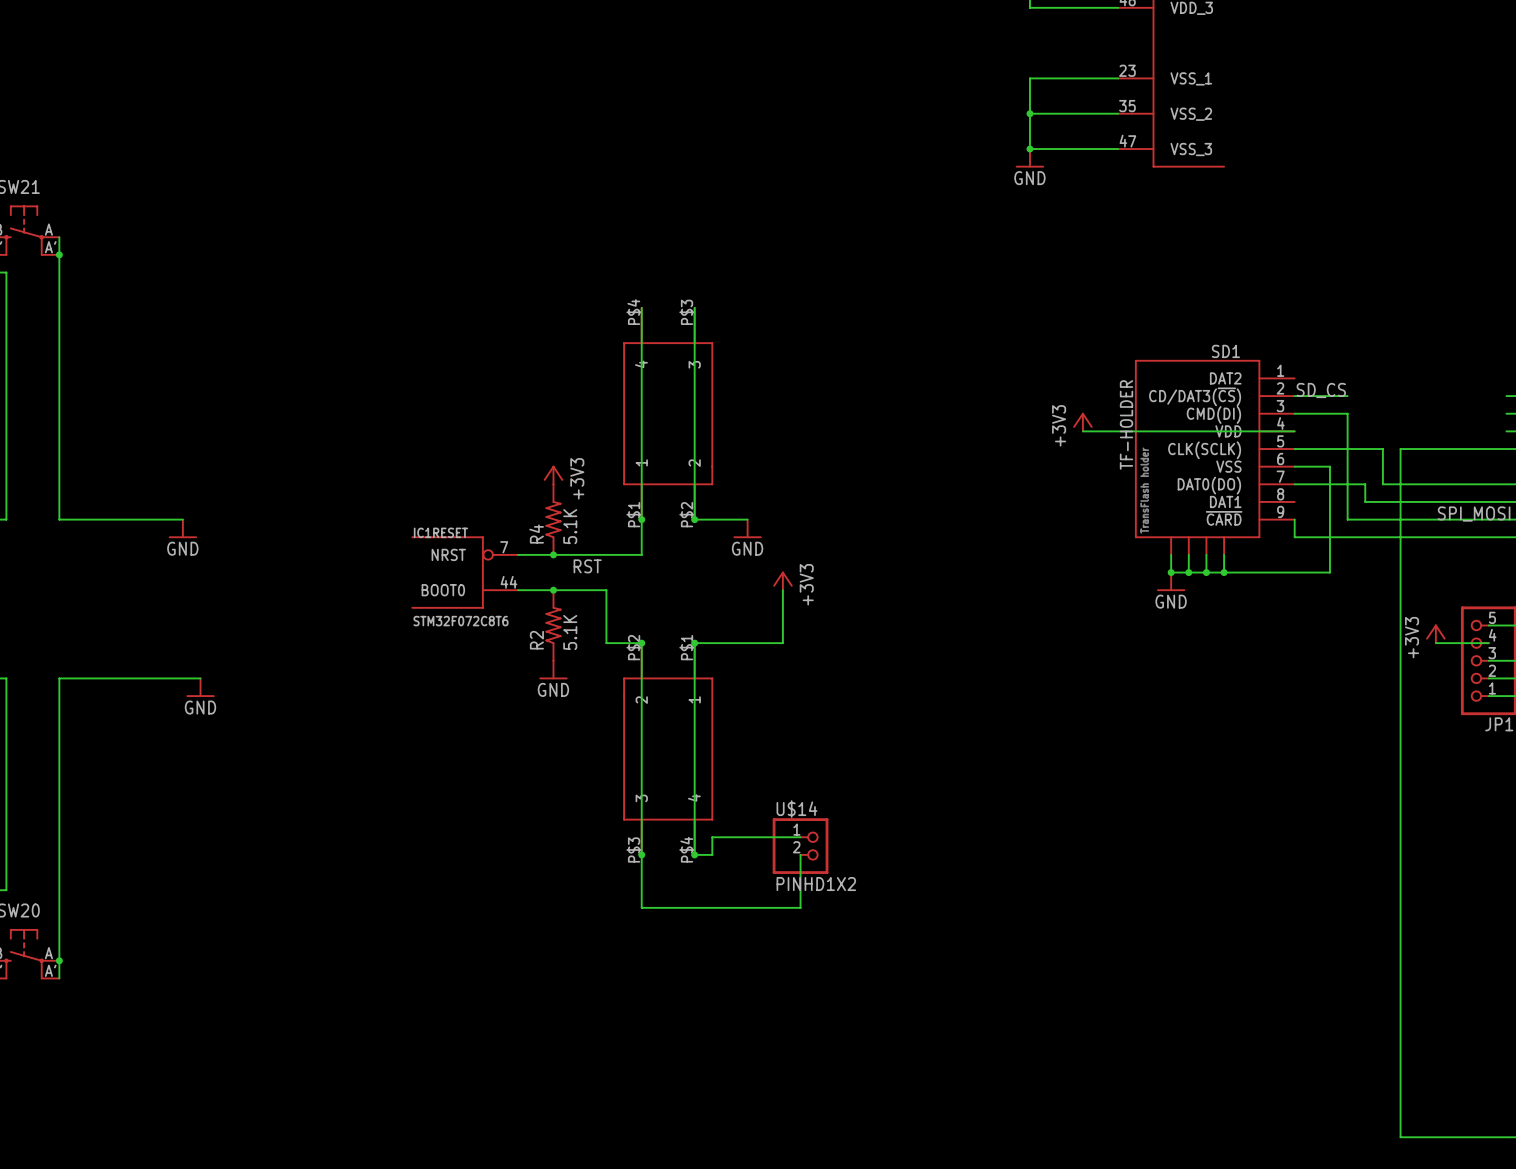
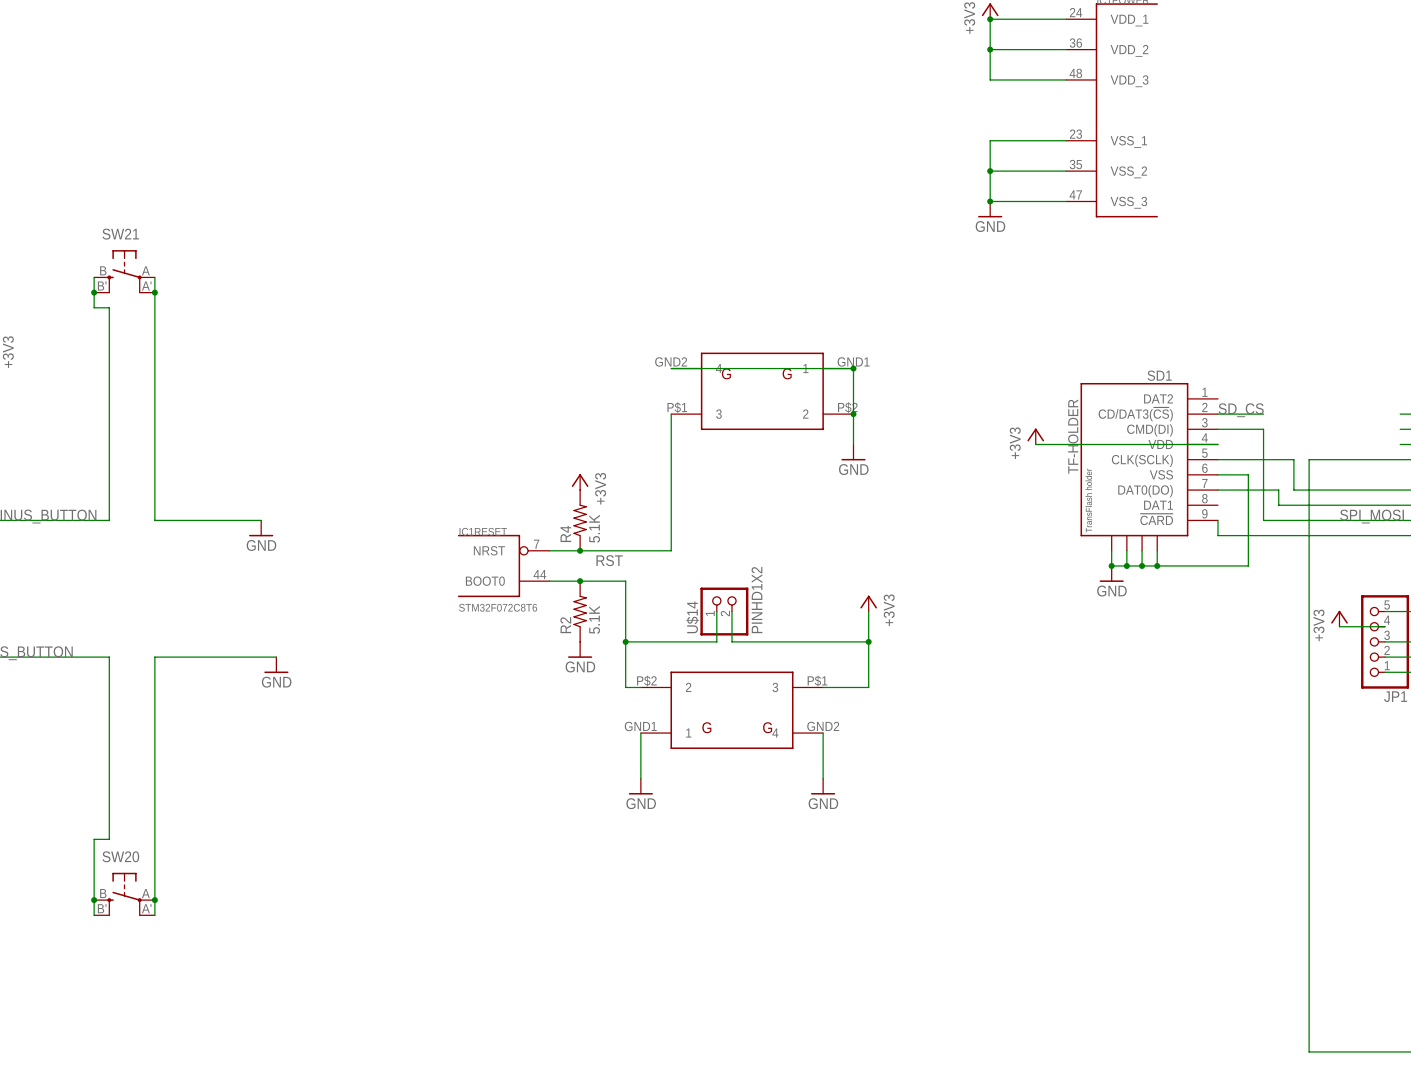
wire: (641, 307) (641, 554) -> (671, 414) (671, 550) (656, 550)
wire: (694, 307) (694, 519) (747, 519) -> none
wire: none -> (671, 368) (853, 368) (853, 444)
junction: none -> (853, 368)
part: none -> (762, 391)
junction: none -> (853, 414)
part: (668, 413) -> none
junction: (641, 519) -> none
junction: (694, 519) -> none
power symbol position: GND (747, 528) -> GND (853, 452)
power symbol position: +3V3 (782, 580) -> +3V3 (868, 603)
wire: (782, 590) (782, 643) (694, 643) (694, 854) (712, 854) (712, 837) (800, 837) -> none
wire: none -> (716, 611) (716, 641) (625, 641)
wire: none -> (731, 611) (731, 641) (868, 641)
wire: none -> (868, 611) (868, 687) (823, 687)
wire: (606, 643) (641, 643) (641, 907) (800, 907) (800, 854) -> (625, 626) (625, 687) (640, 687)
junction position: (641, 643) -> (625, 641)
junction: (694, 643) -> none
junction: none -> (868, 641)
part: none -> (731, 710)
part: (668, 749) -> none
wire: none -> (823, 733) (823, 778)
power symbol: none -> GND (640, 786)
power symbol: none -> GND (823, 786)
U$14 rotation: 0° (800, 846) -> 90° counterclockwise (724, 611)
U$14 position: (800, 846) -> (724, 611)
junction: (641, 854) -> none
junction: (694, 854) -> none

